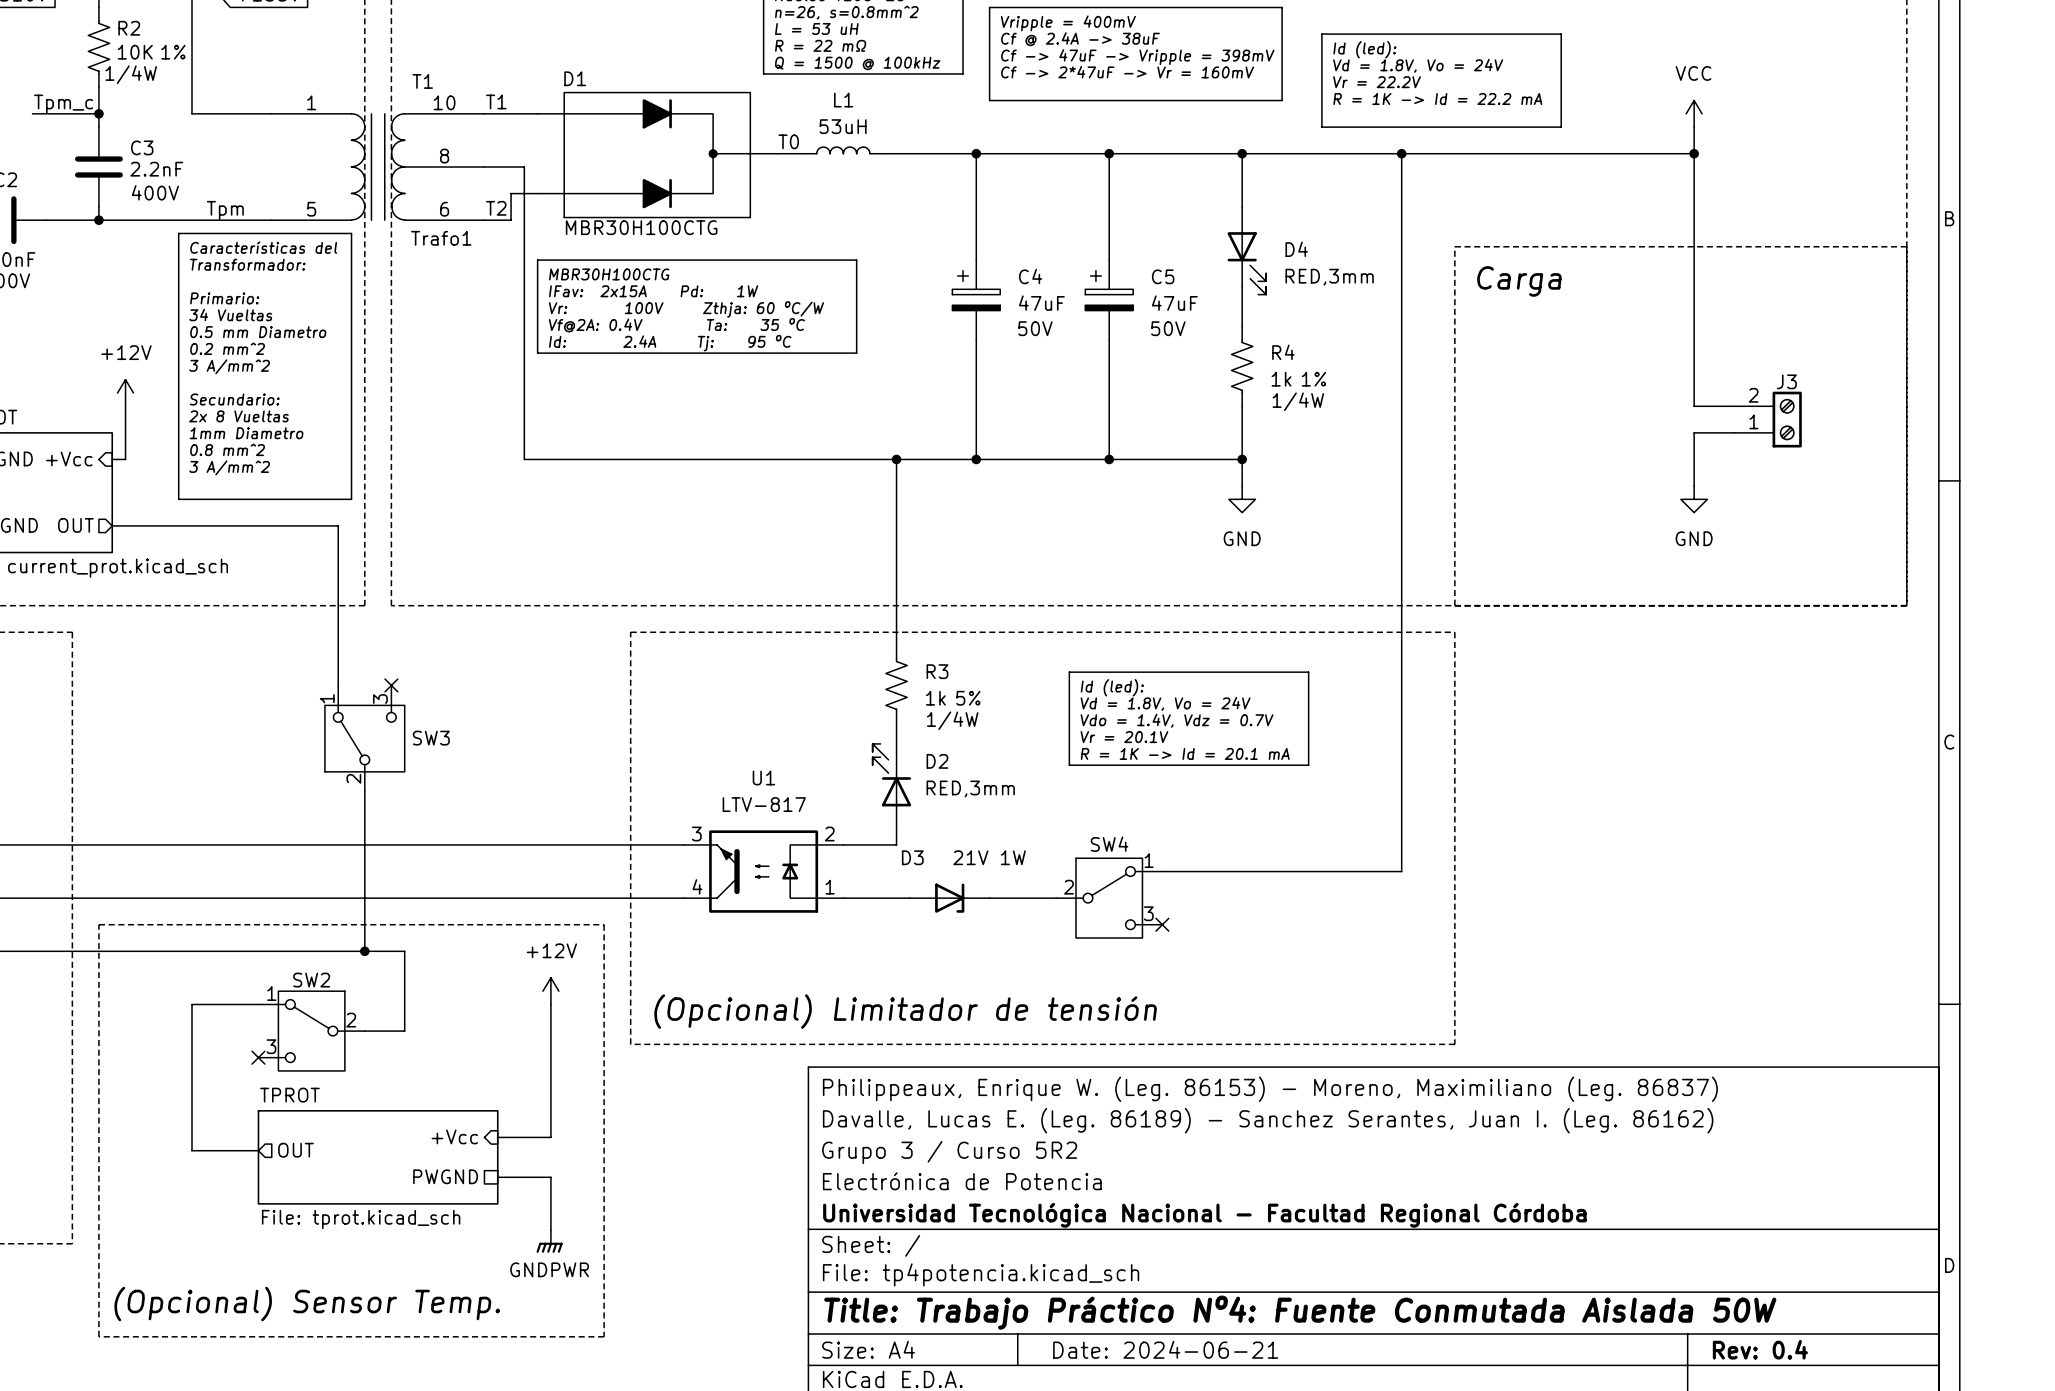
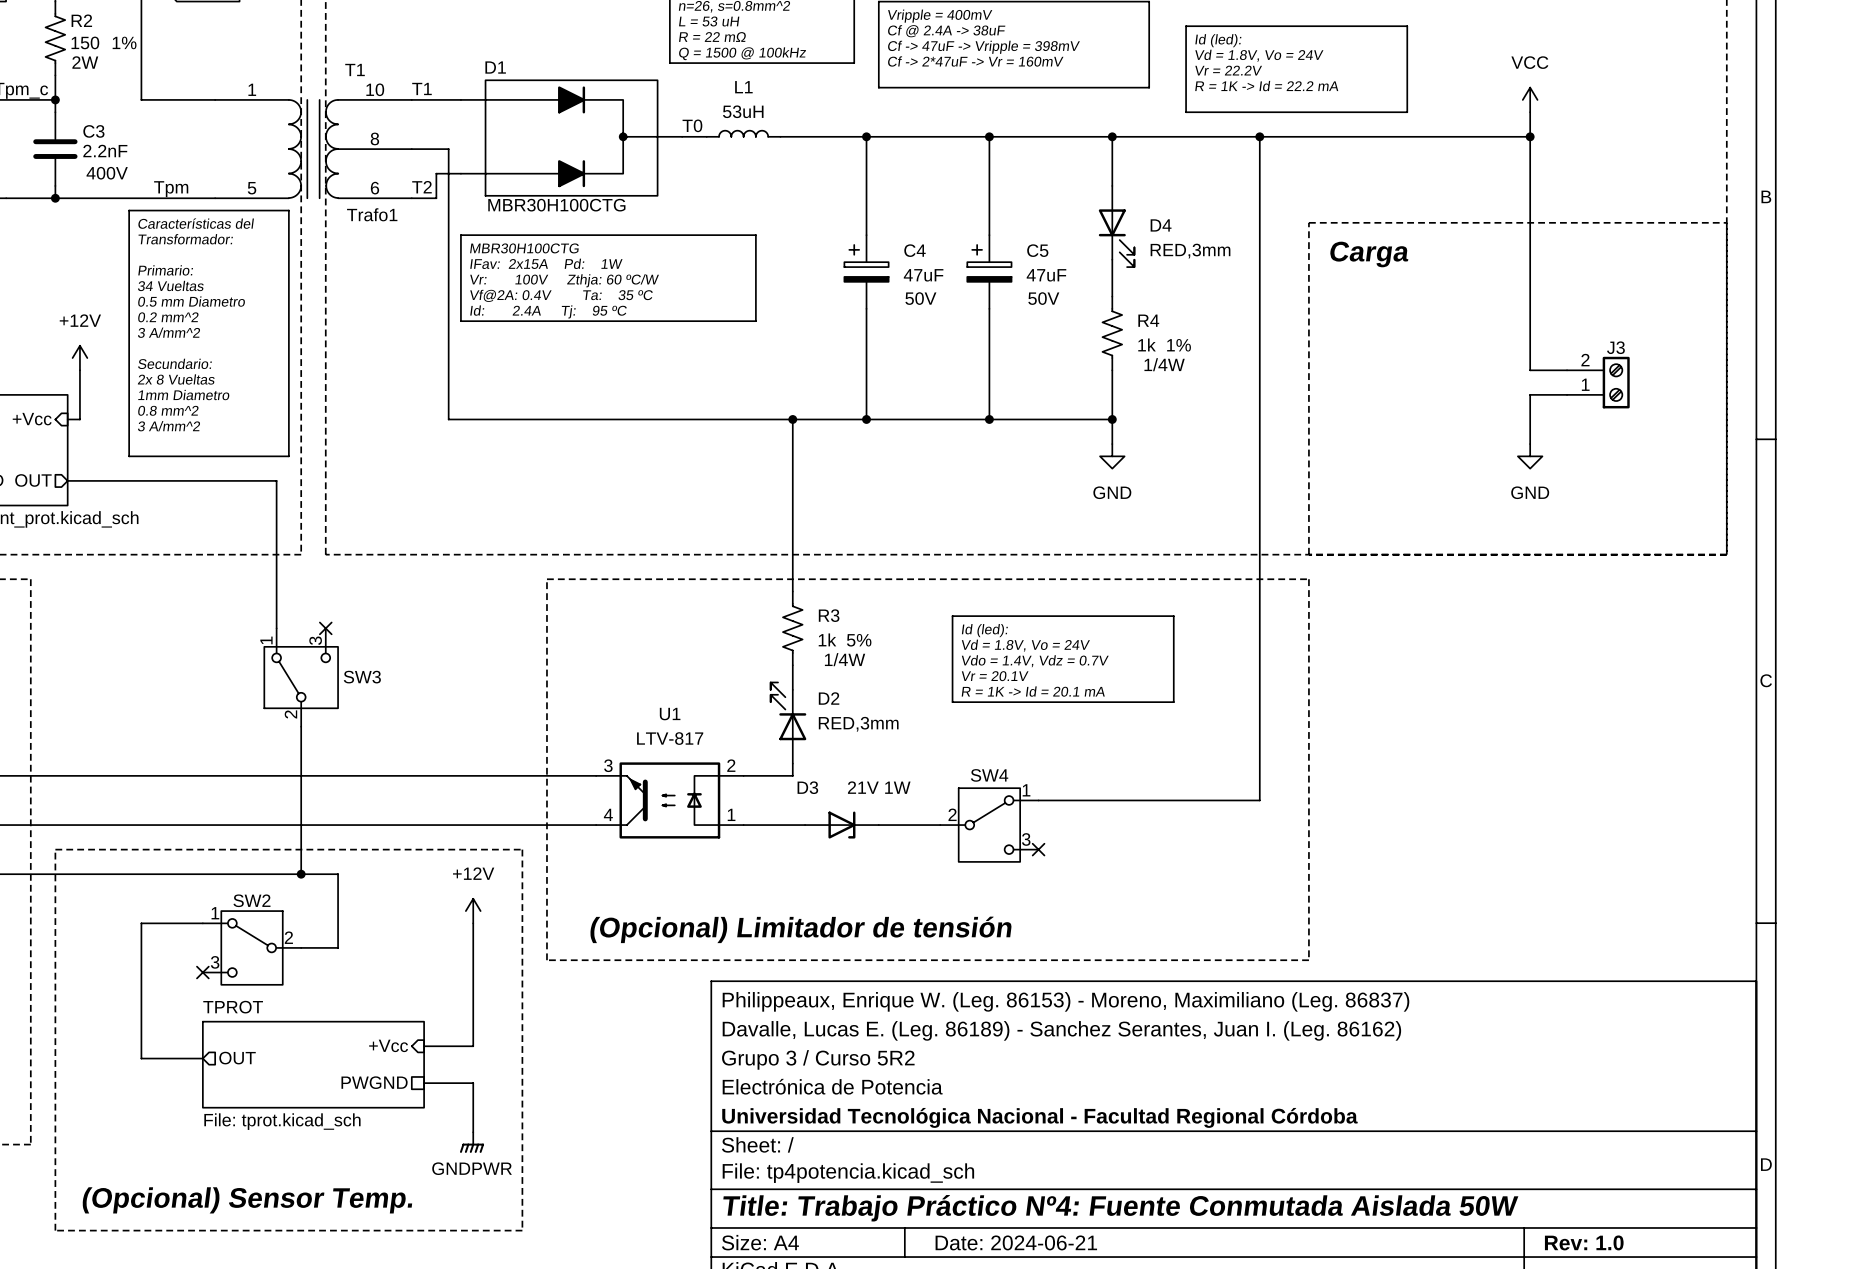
R2 value: 10K (135, 52) -> 150 (85, 42)
R2 text: 1/4W (131, 74) -> 2W (85, 62)
title block: Rev: 0.4 (1760, 1349) -> Rev: 1.0 (1584, 1242)

